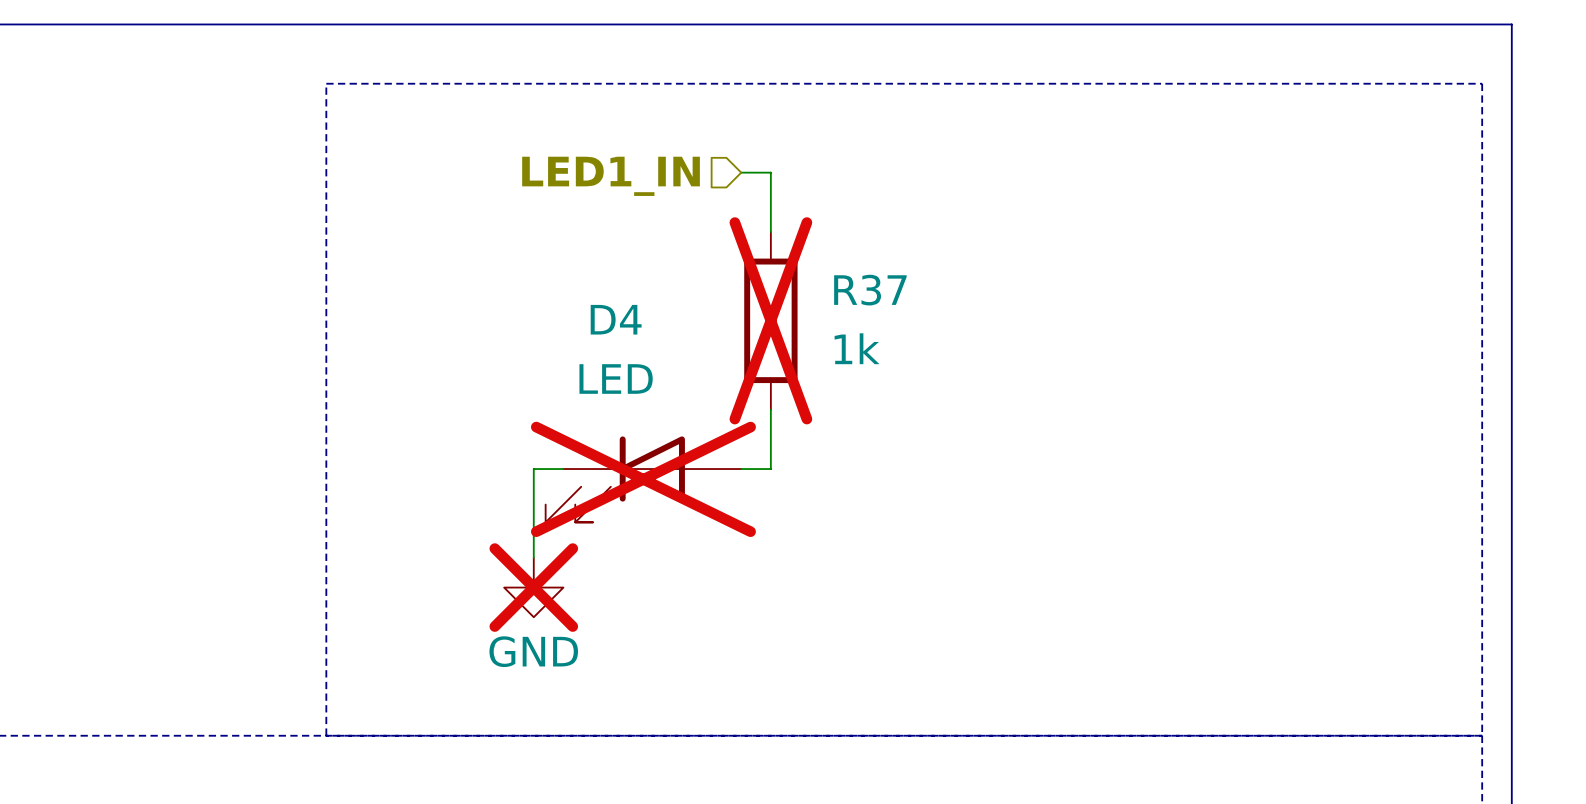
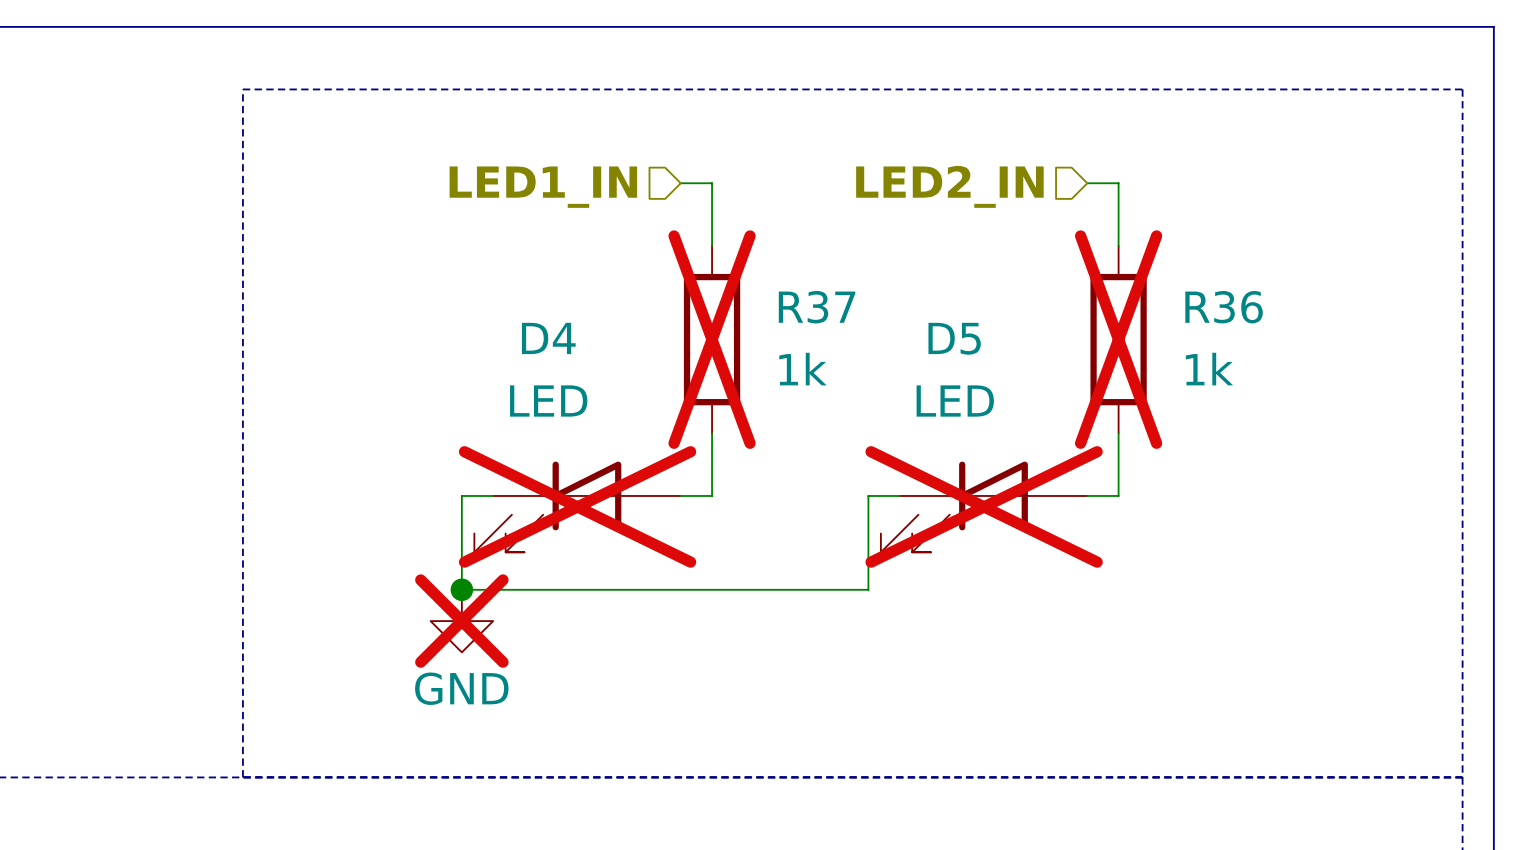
wire: none -> (1087, 183) (1118, 183) (1118, 245)
hierarchical label: none -> LED2_IN (949, 186)
R36: none -> 1k (1118, 339)
wire: none -> (1118, 433) (1118, 495) (1087, 495)
wire: none -> (899, 495) (868, 495) (868, 589) (461, 589)
D5: none -> LED (984, 506)
junction: none -> (461, 589)

